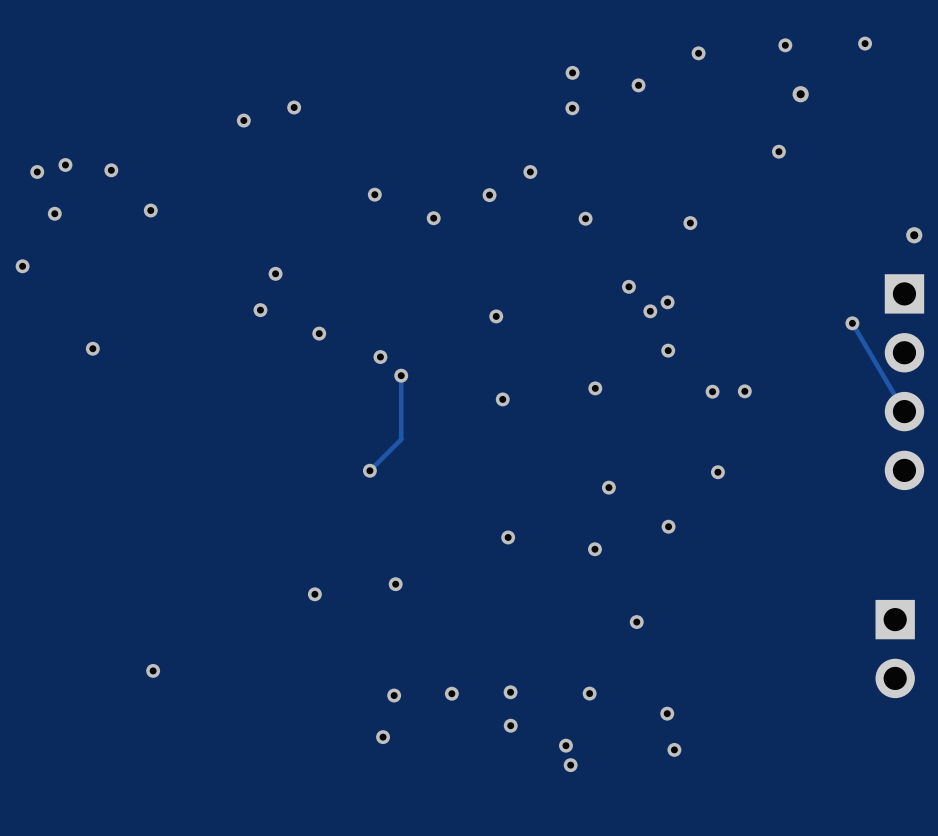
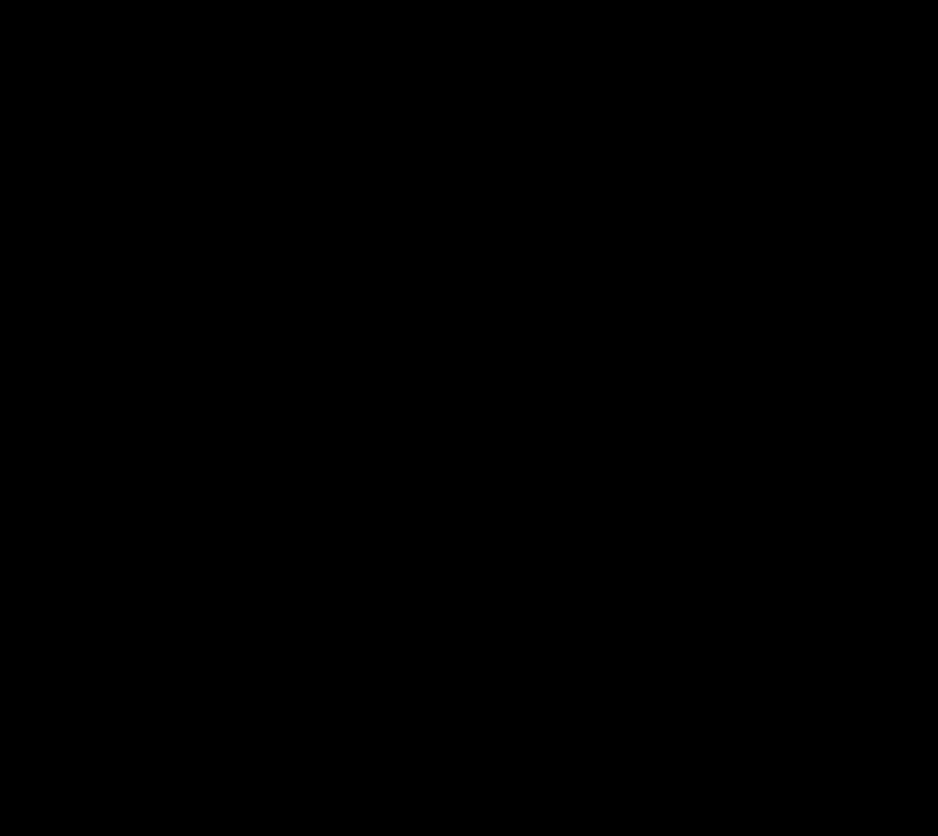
via: (865, 43) -> none
via: (785, 45) -> none
via: (698, 53) -> none
via: (572, 72) -> none
via: (638, 85) -> none
via: (800, 94) -> none
via: (294, 107) -> none
via: (572, 108) -> none
via: (243, 120) -> none
via: (778, 151) -> none
via: (65, 165) -> none
via: (111, 170) -> none
via: (37, 171) -> none
via: (530, 171) -> none
via: (374, 194) -> none
via: (489, 195) -> none
via: (150, 210) -> none
via: (54, 213) -> none
via: (433, 218) -> none
via: (585, 218) -> none
via: (690, 223) -> none
via: (914, 235) -> none
via: (22, 266) -> none
via: (275, 273) -> none
via: (628, 286) -> none
via: (667, 302) -> none
via: (260, 310) -> none
via: (650, 311) -> none
via: (496, 316) -> none
track: (852, 323) (904, 411) -> none
via: (852, 323) -> none
via: (319, 333) -> none
via: (92, 348) -> none
via: (668, 350) -> none
via: (380, 357) -> none
track: (401, 375) (401, 439) (369, 470) -> none
via: (401, 375) -> none
part: (904, 382) -> none
via: (595, 388) -> none
via: (712, 391) -> none
via: (744, 391) -> none
via: (502, 399) -> none
via: (369, 470) -> none
via: (717, 472) -> none
via: (608, 487) -> none
via: (668, 526) -> none
via: (508, 537) -> none
via: (594, 549) -> none
via: (395, 584) -> none
via: (314, 594) -> none
via: (636, 622) -> none
part: (895, 649) -> none
via: (153, 670) -> none
via: (510, 692) -> none
via: (451, 693) -> none
via: (589, 693) -> none
via: (394, 695) -> none
via: (667, 713) -> none
via: (510, 725) -> none
via: (383, 737) -> none
via: (565, 745) -> none
via: (674, 749) -> none
via: (570, 765) -> none

